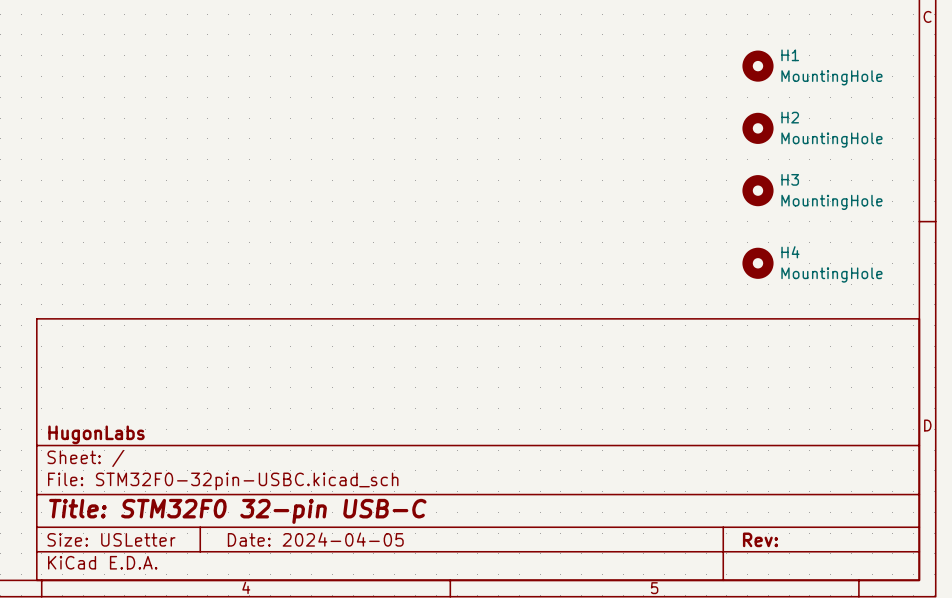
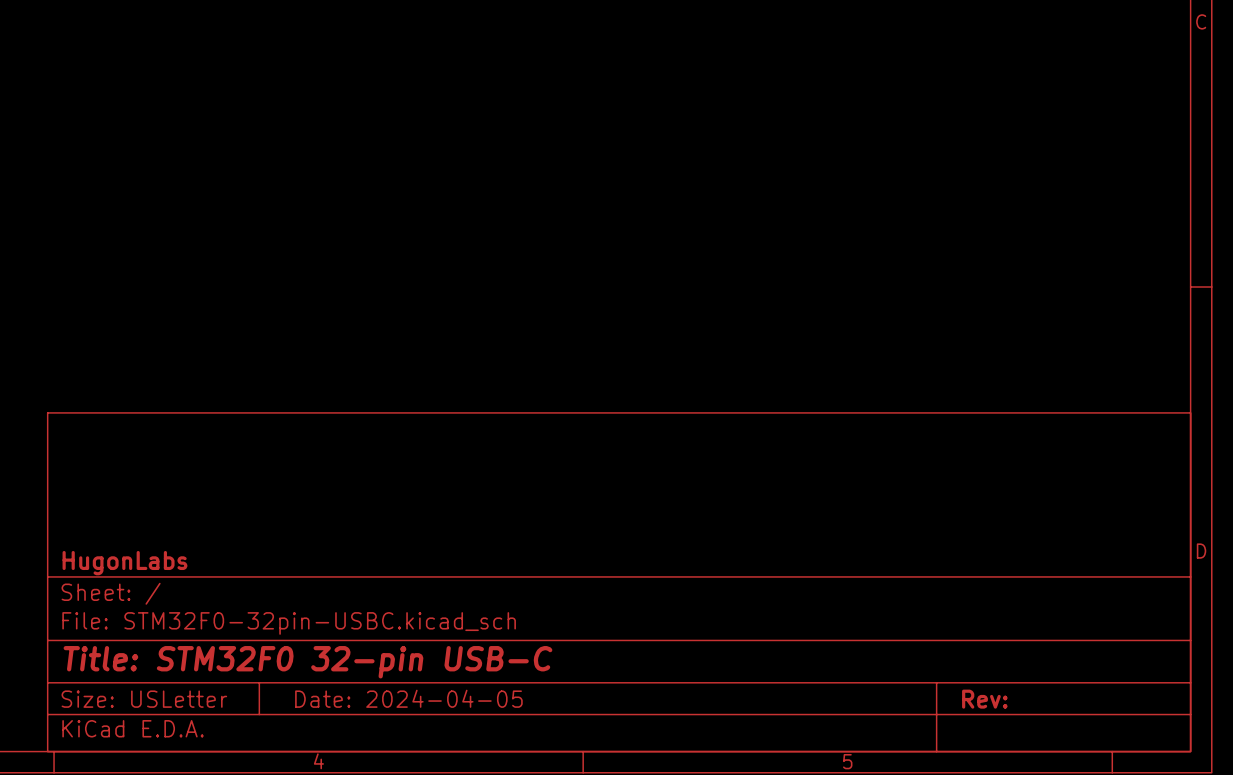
H1: MountingHole (757, 66) -> none
H2: MountingHole (757, 128) -> none
H3: MountingHole (757, 190) -> none
H4: MountingHole (757, 263) -> none

